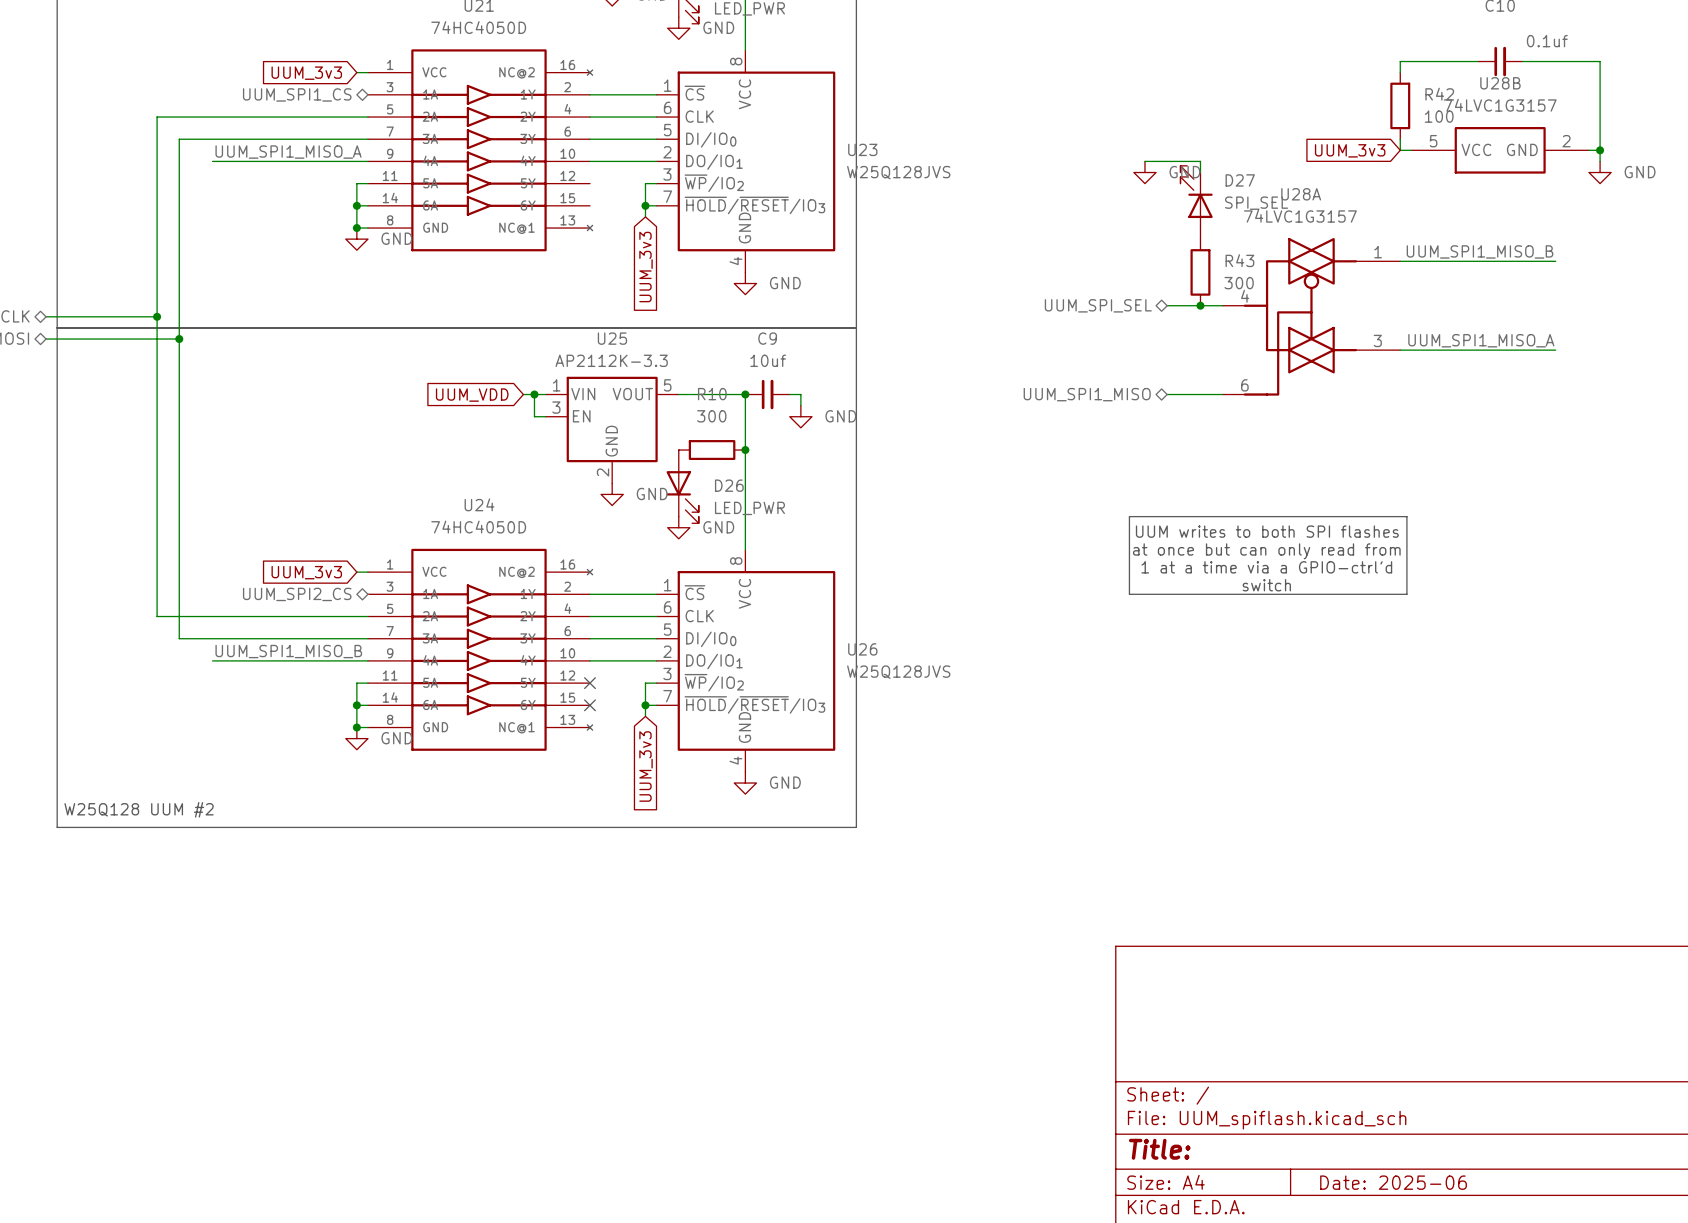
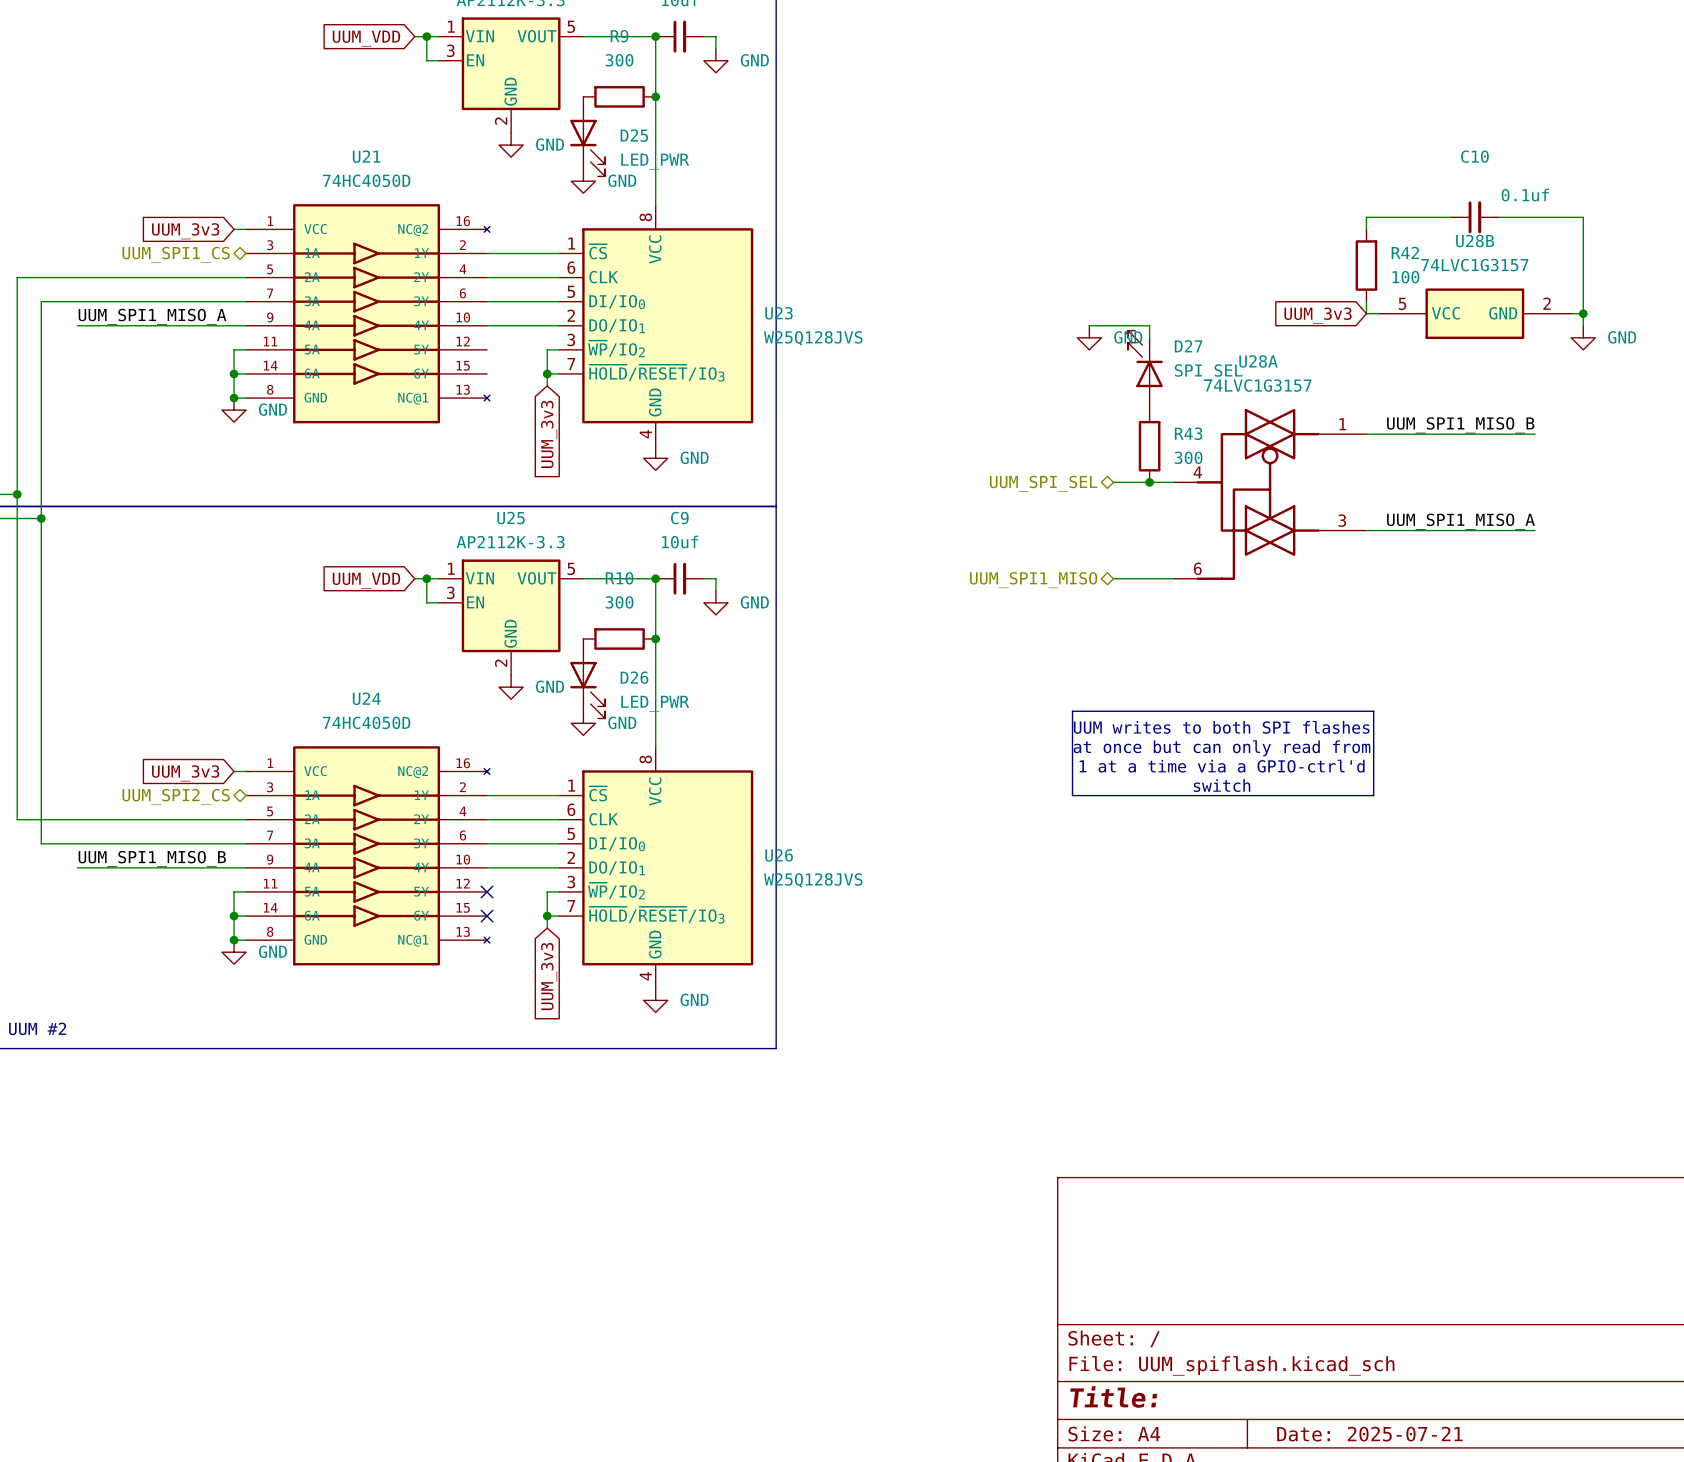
title block: Date: 2025-06 (1393, 1182) -> Date: 2025-07-21 (1369, 1434)

